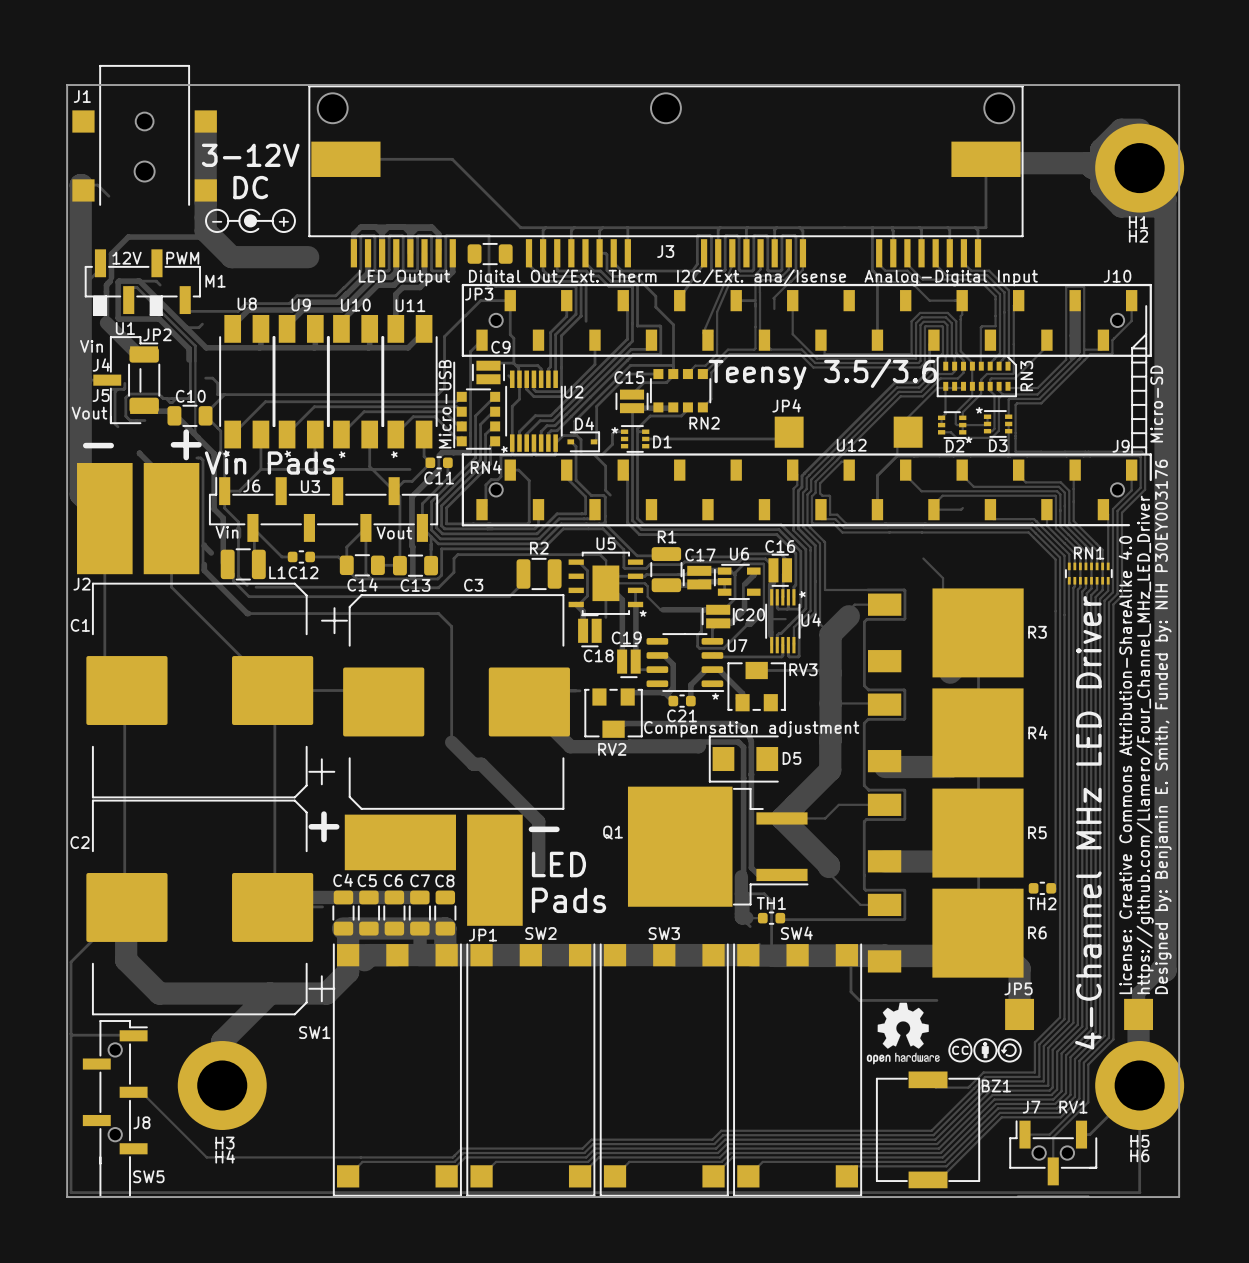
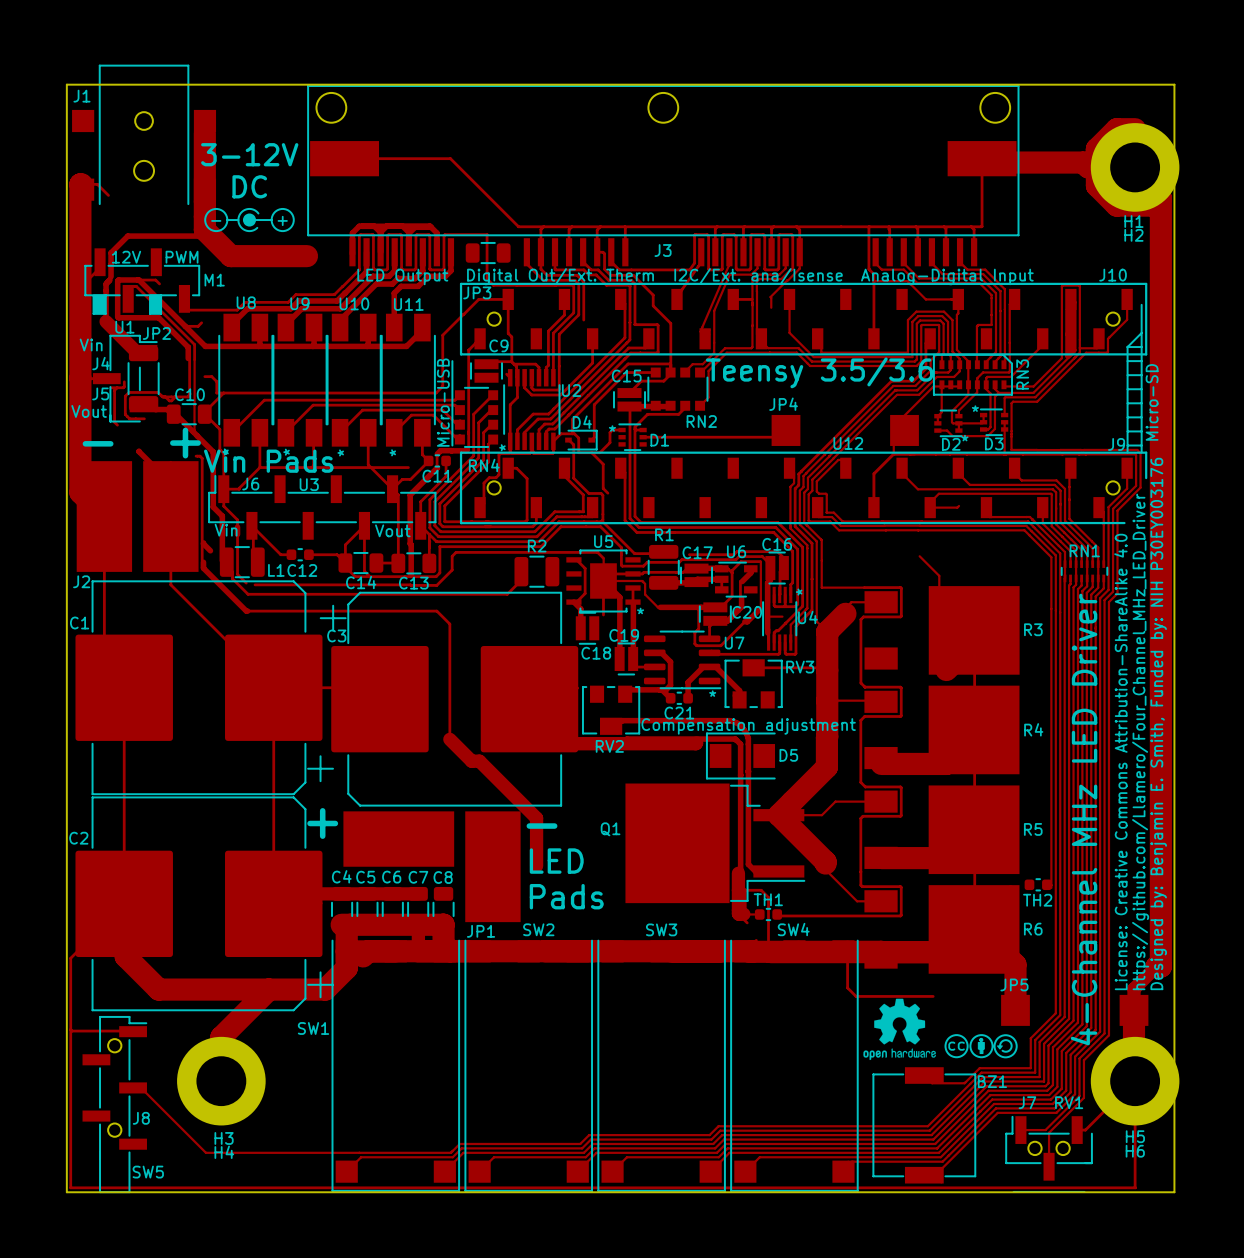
C1 footprint: [86, 582, 336, 799] -> [75, 580, 334, 795]
C3 name position: C3 (473, 585) -> C3 (336, 635)
C3 footprint: [321, 594, 570, 810] -> [320, 592, 579, 807]
C2 footprint: [86, 799, 336, 1016] -> [75, 796, 334, 1011]

